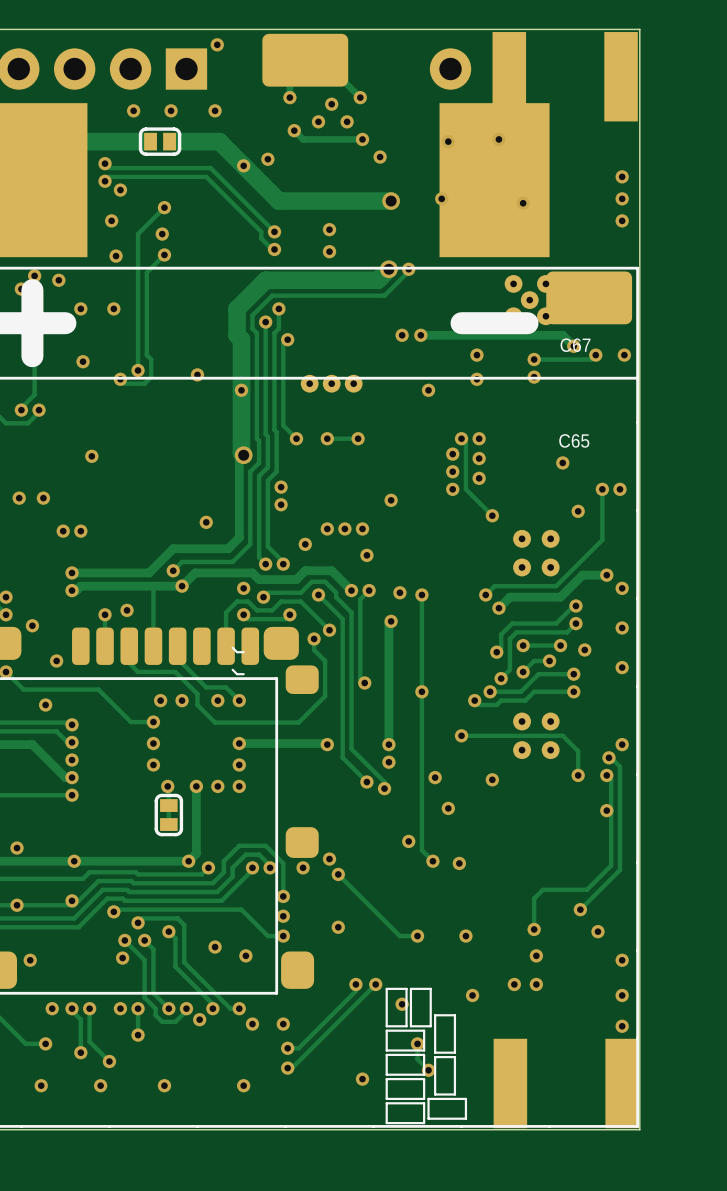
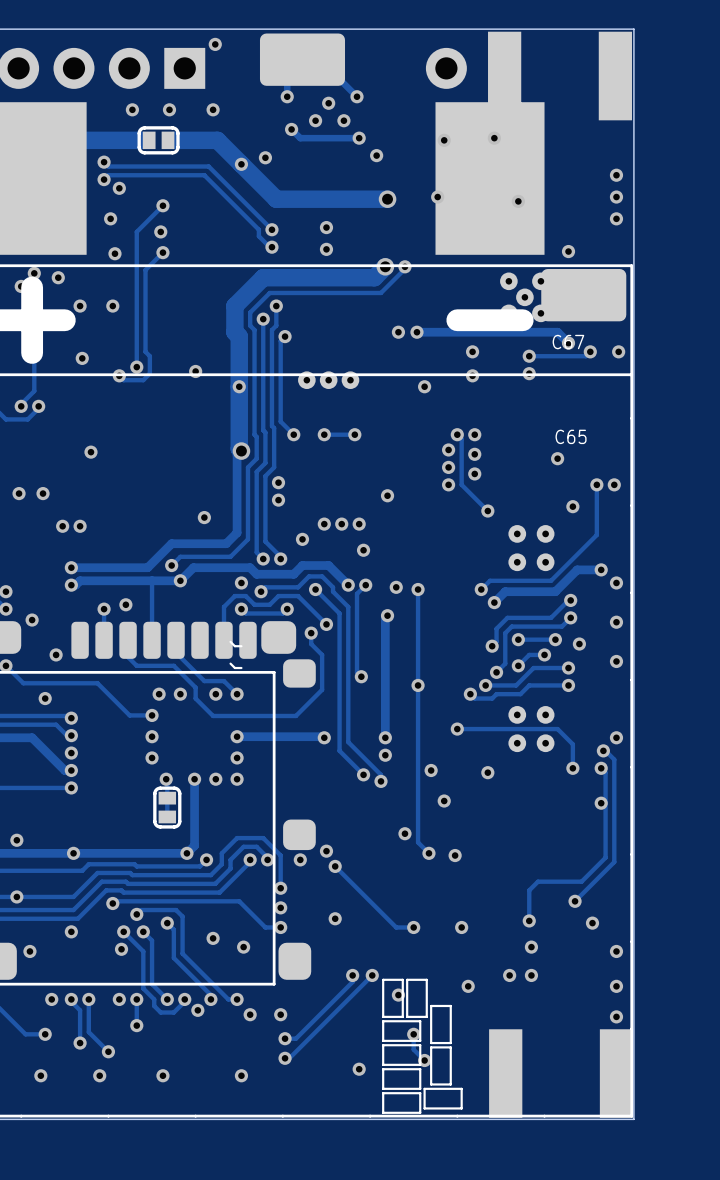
via: none -> (568, 251)
via position: (72, 900) -> (71, 931)

